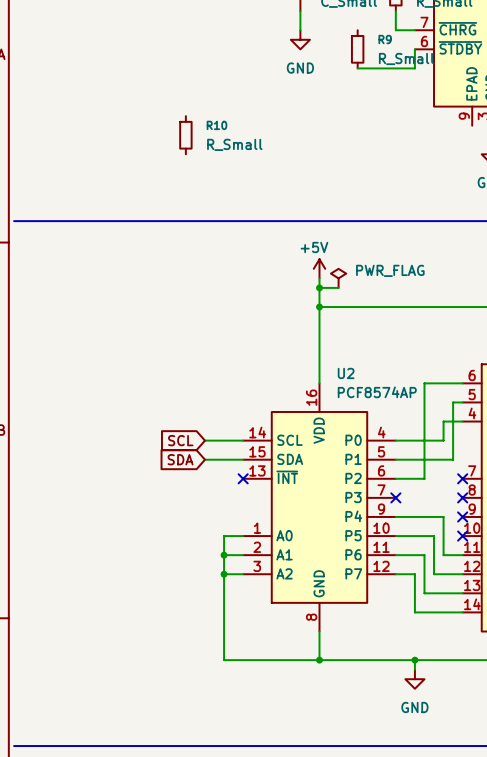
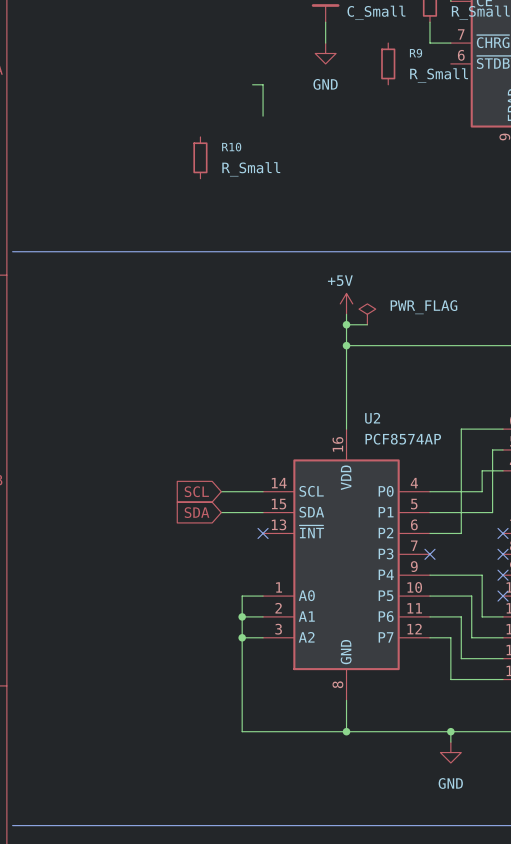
wire: (414, 49) (414, 68) (357, 68) -> none
wire: none -> (252, 84) (263, 84) (263, 116)

